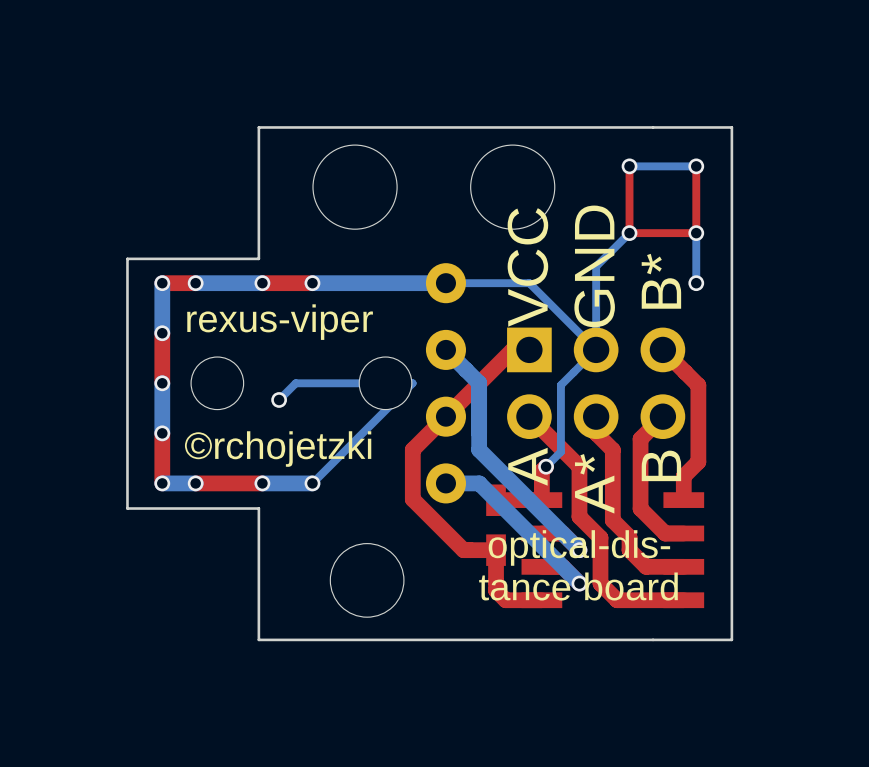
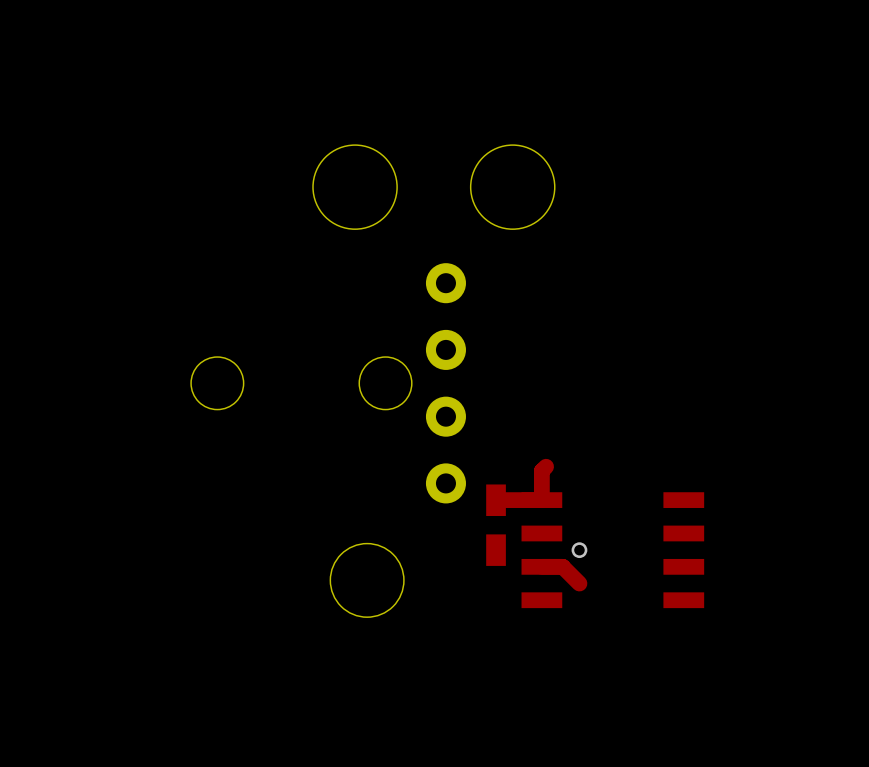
board edge: (731, 127) (731, 639) (258, 639) (258, 508) (127, 508) (127, 258) (258, 258) (258, 127) (731, 127) -> none
via: (629, 166) -> none
bottom track: (696, 166) (629, 166) -> none
top track: (696, 166) (696, 233) (629, 233) (629, 166) -> none
via: (696, 166) -> none
bottom track: (629, 233) (596, 266) (596, 349) -> none
via: (629, 233) -> none
bottom track: (696, 233) (696, 283) -> none
via: (696, 233) -> none
text: GND (594, 266) -> none
text: VCC (527, 267) -> none
text: B* (661, 281) -> none
bottom track: (162, 283) (162, 333) -> none
via: (162, 283) -> none
top track: (195, 283) (162, 283) -> none
via: (195, 283) -> none
bottom track: (262, 283) (195, 283) -> none
via: (262, 283) -> none
bottom track: (312, 283) (529, 283) (596, 349) -> none
top track: (312, 283) (262, 283) -> none
via: (312, 283) -> none
via: (696, 283) -> none
text: rexus-viper (280, 322) -> none
top track: (162, 333) (162, 383) -> none
via: (162, 333) -> none
bottom track: (445, 349) (479, 383) (479, 449) (579, 550) -> none
top track: (529, 349) (512, 349) (412, 449) (412, 499) (463, 550) (496, 550) (496, 590) (505, 600) (541, 600) -> none
bottom track: (596, 349) (560, 385) (560, 451) (546, 466) -> none
top track: (662, 349) (698, 385) (698, 461) (683, 476) (683, 500) -> none
bottom track: (162, 383) (162, 433) -> none
via: (162, 383) -> none
part: (596, 383) -> none
bottom track: (279, 399) (295, 383) (412, 383) (312, 483) (262, 483) -> none
via: (279, 399) -> none
top track: (529, 416) (579, 466) (579, 516) (600, 537) (600, 583) (617, 600) (683, 600) -> none
top track: (596, 416) (596, 433) (612, 450) (612, 520) (629, 537) (629, 550) (646, 566) (683, 566) -> none
top track: (662, 416) (640, 439) (640, 508) (665, 533) (683, 533) -> none
top track: (162, 433) (162, 483) -> none
via: (162, 433) -> none
text: ©rchojetzki (278, 449) -> none
text: B (661, 465) -> none
text: A (527, 466) -> none
via: (546, 466) -> none
via: (162, 483) -> none
bottom track: (195, 483) (162, 483) -> none
via: (195, 483) -> none
top track: (262, 483) (195, 483) -> none
via: (262, 483) -> none
via: (312, 483) -> none
bottom track: (445, 483) (479, 483) (579, 583) -> none
text: A* (594, 483) -> none
text: optical-dis- (579, 547) -> none
via: (579, 583) -> none
text: tance board (578, 586) -> none

